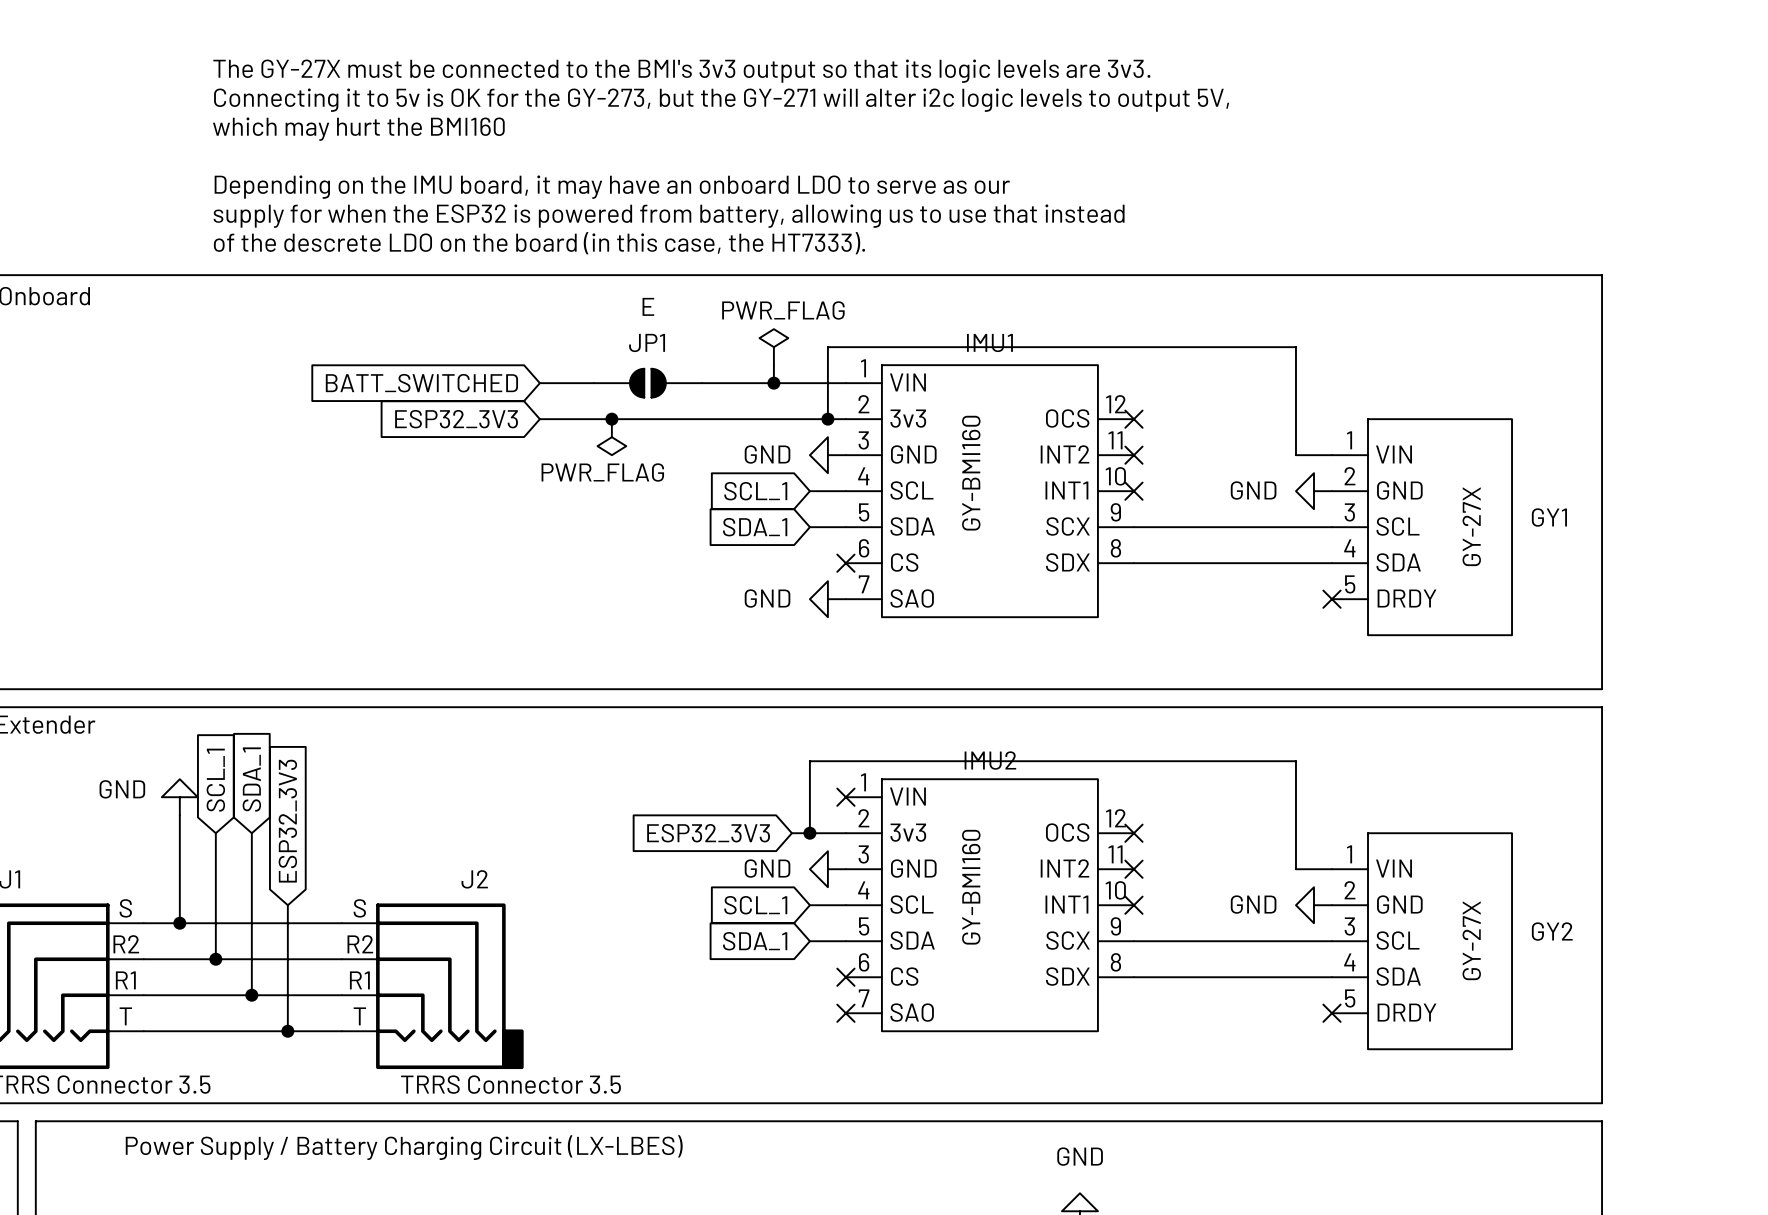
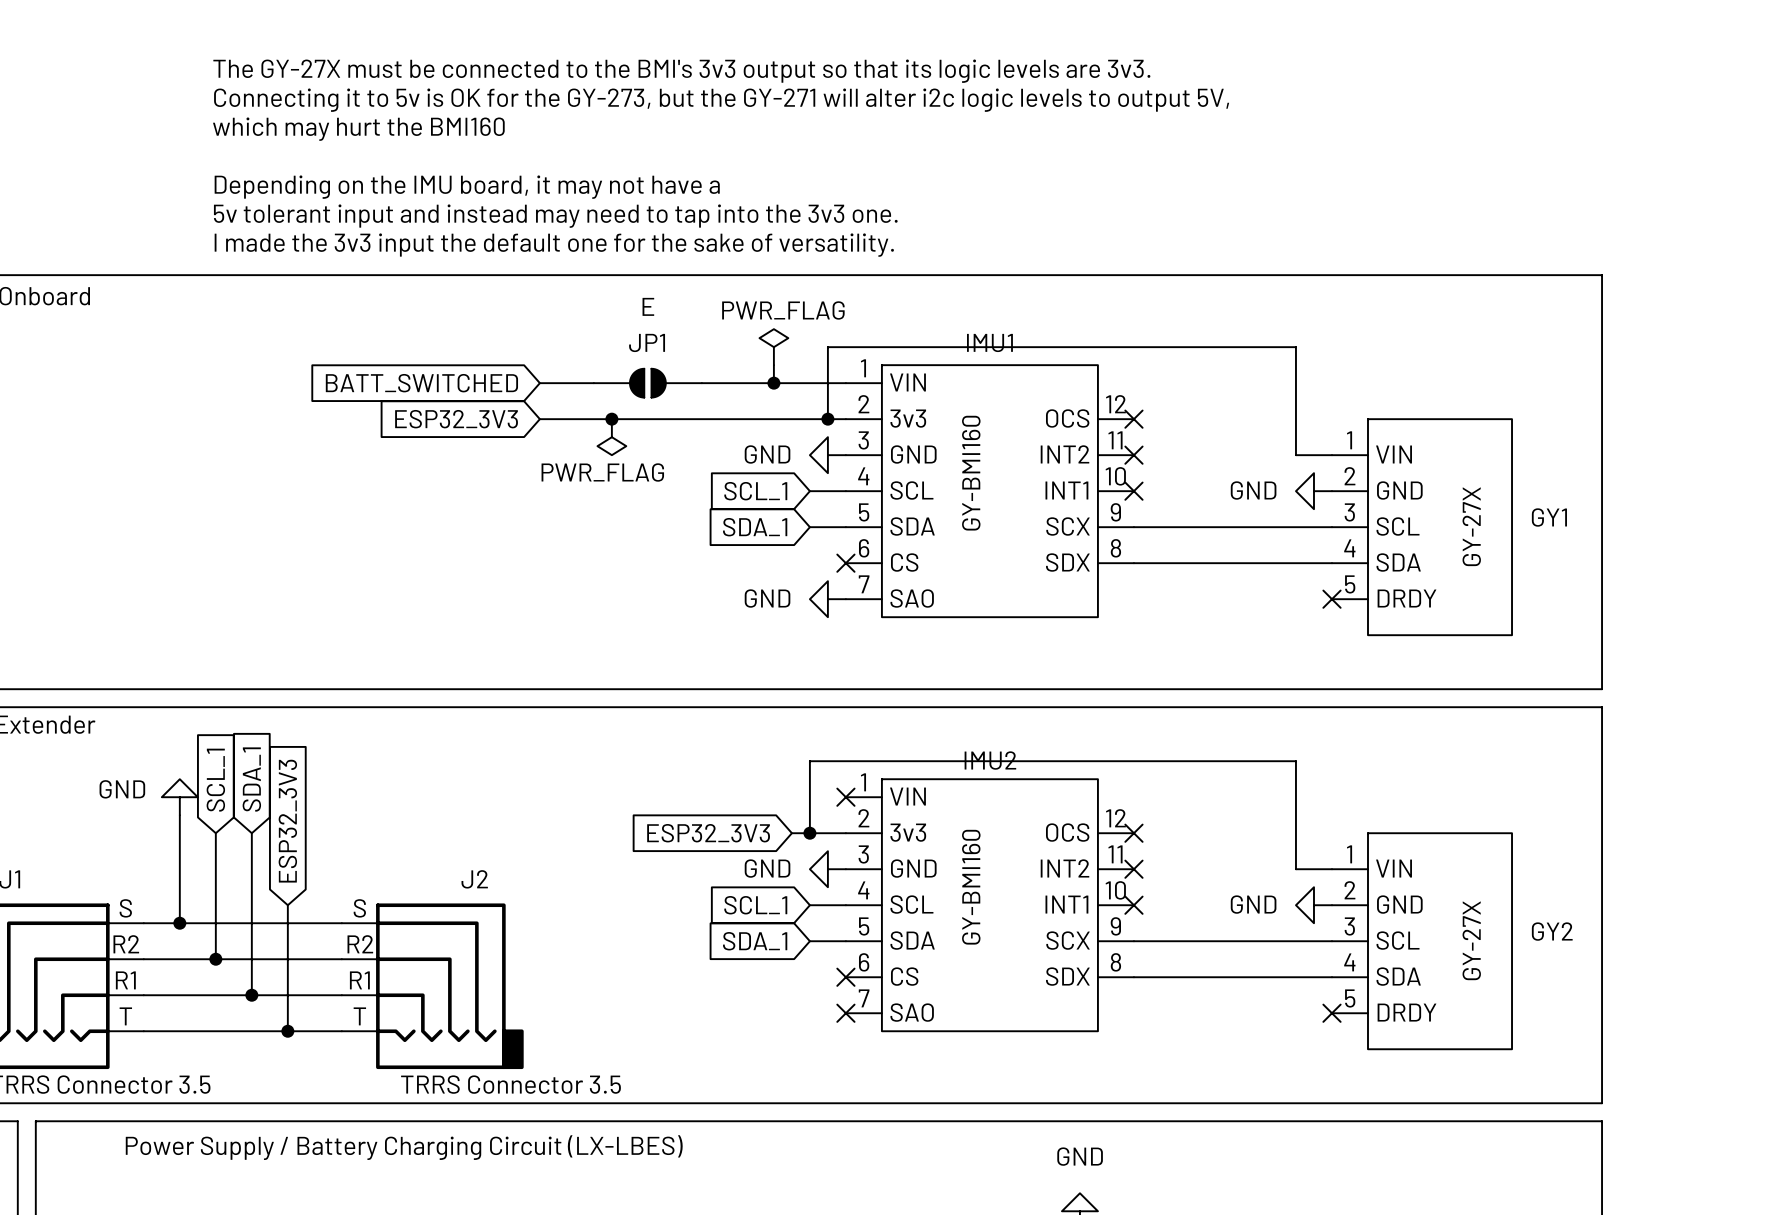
text: Depending on the IMU board, it may have an onboard LDO to serve as our (612, 187) -> Depending on the IMU board, it may not have a (467, 187)
text: supply for when the ESP32 is powered from battery, allowing us to use that instead (669, 216) -> 5v tolerant input and instead may need to tap into the 3v3 one. (555, 216)
text: of the descrete LDO on the board (in this case, the HT7333). (539, 243) -> I made the 3v3 input the default one for the sake of versatility. (554, 245)

